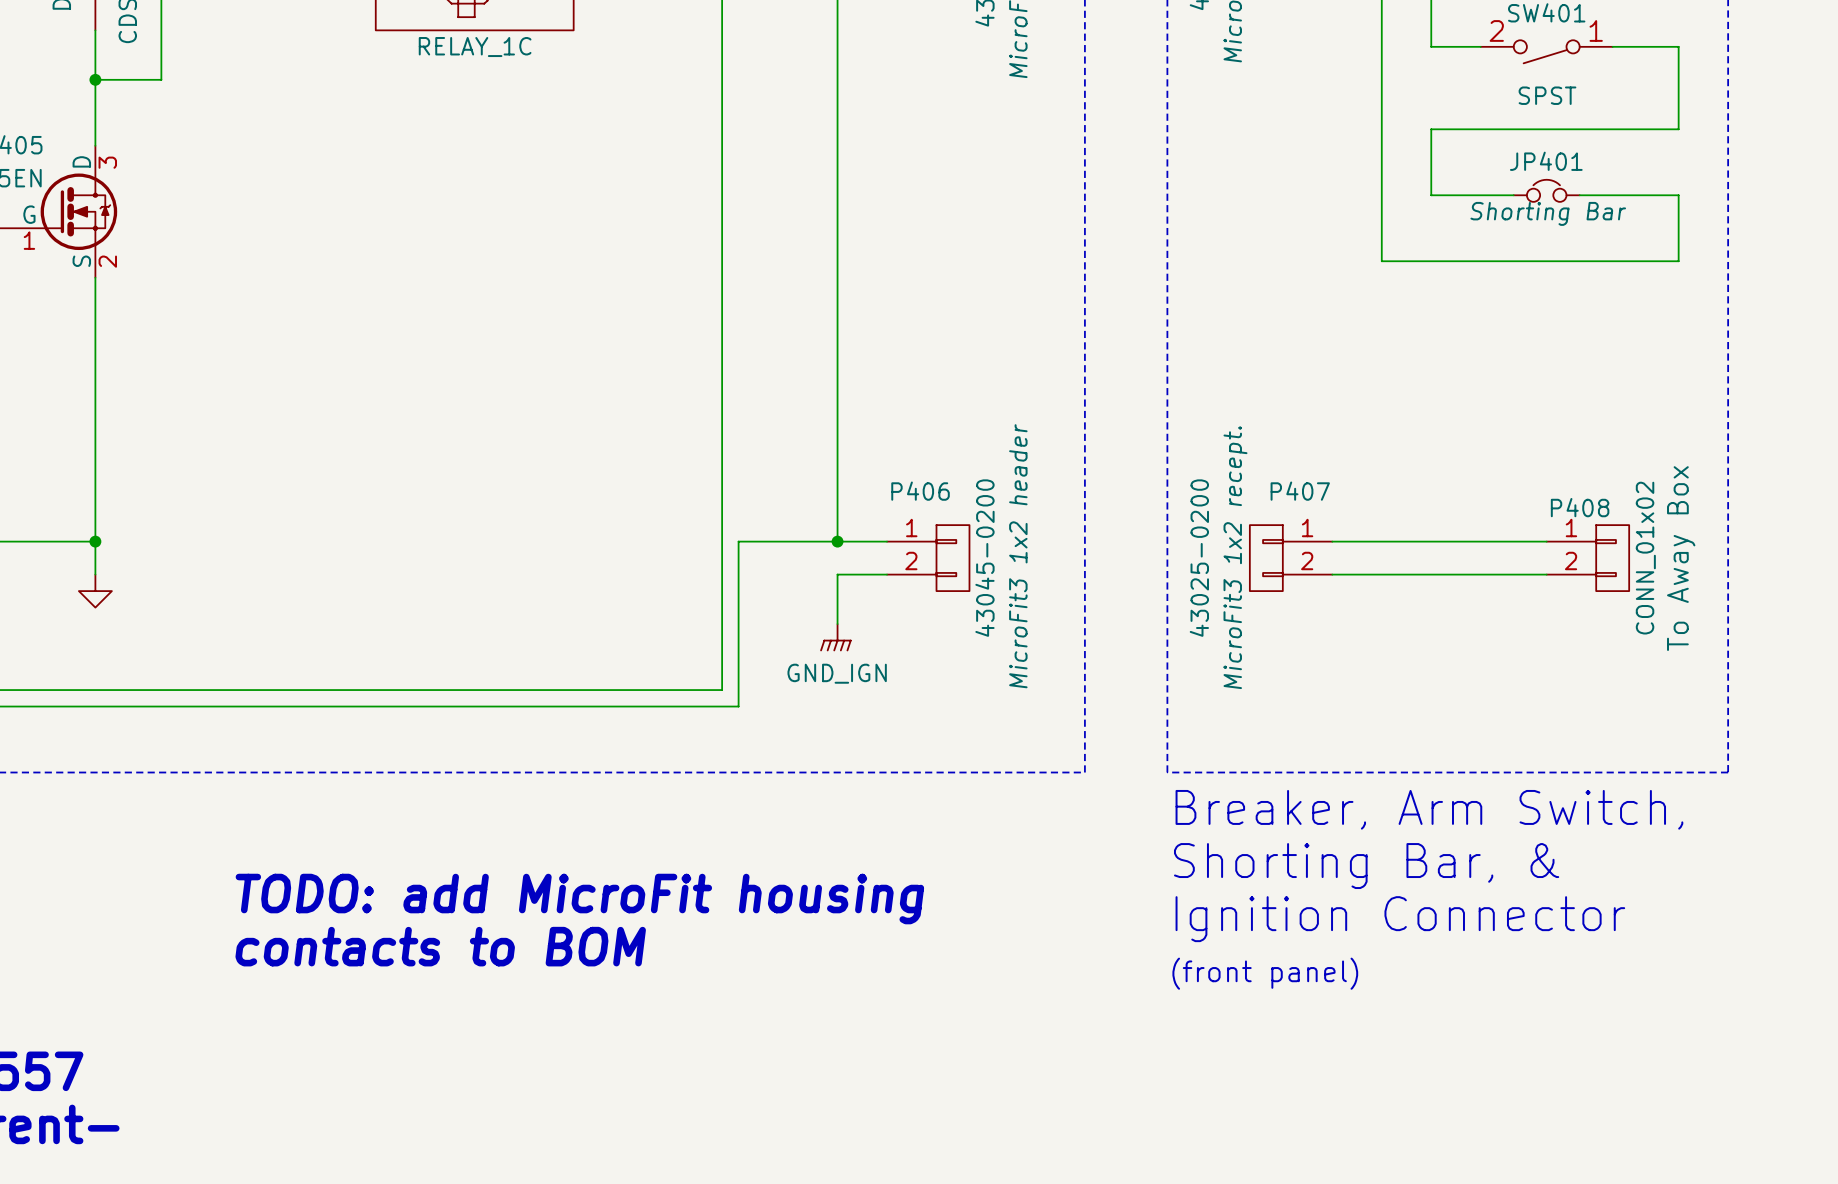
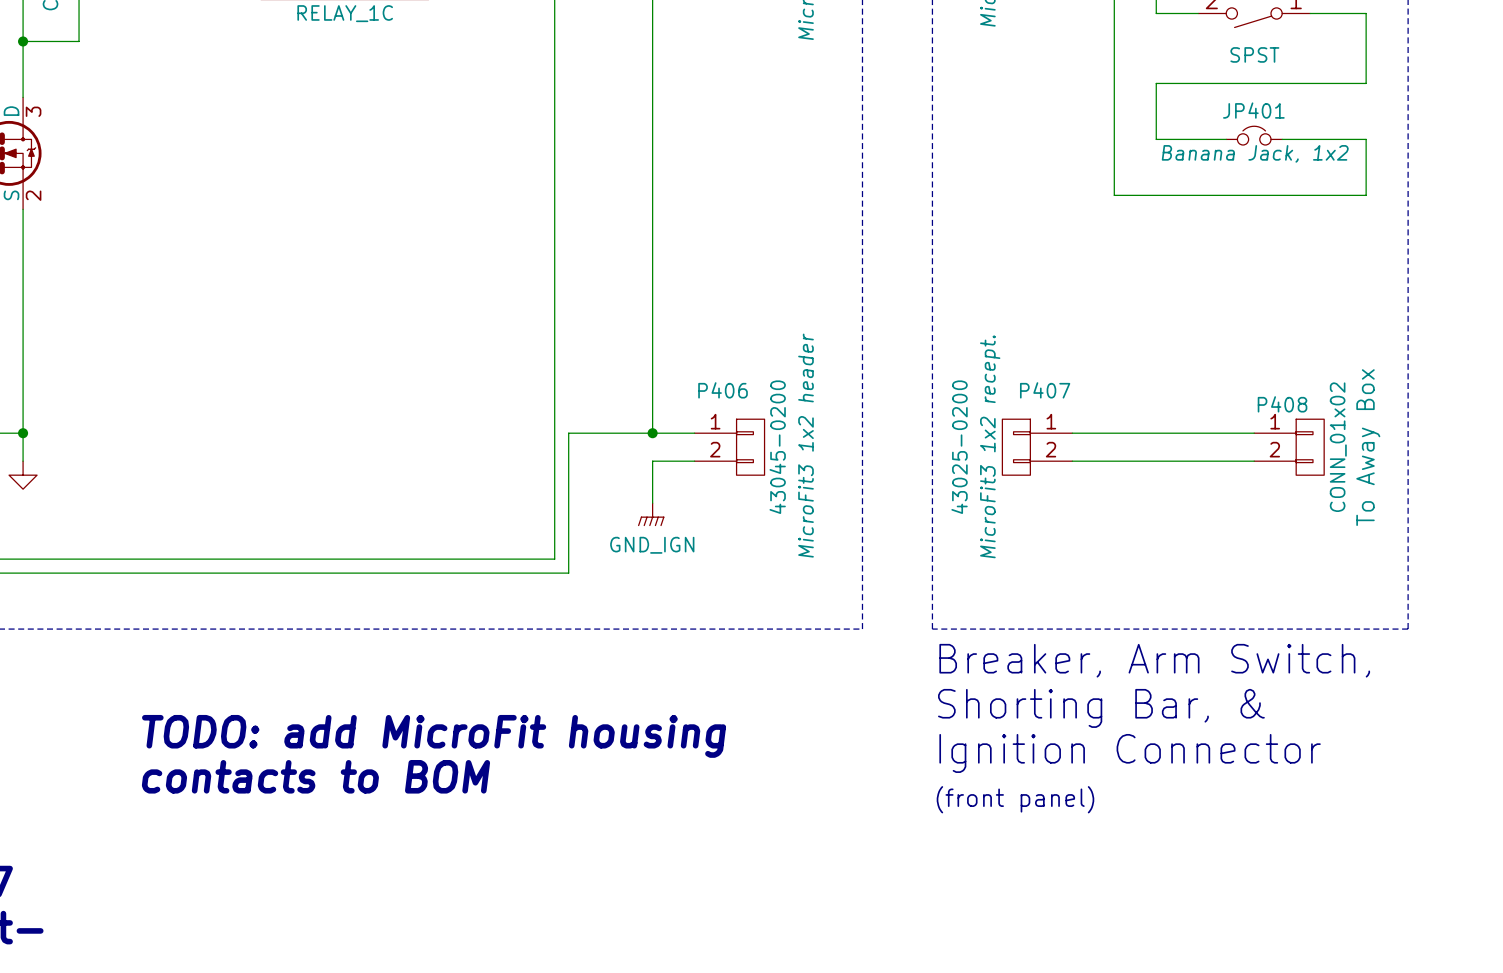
JP401 text: Shorting Bar (1548, 213) -> Banana Jack, 1x2 (1255, 153)

